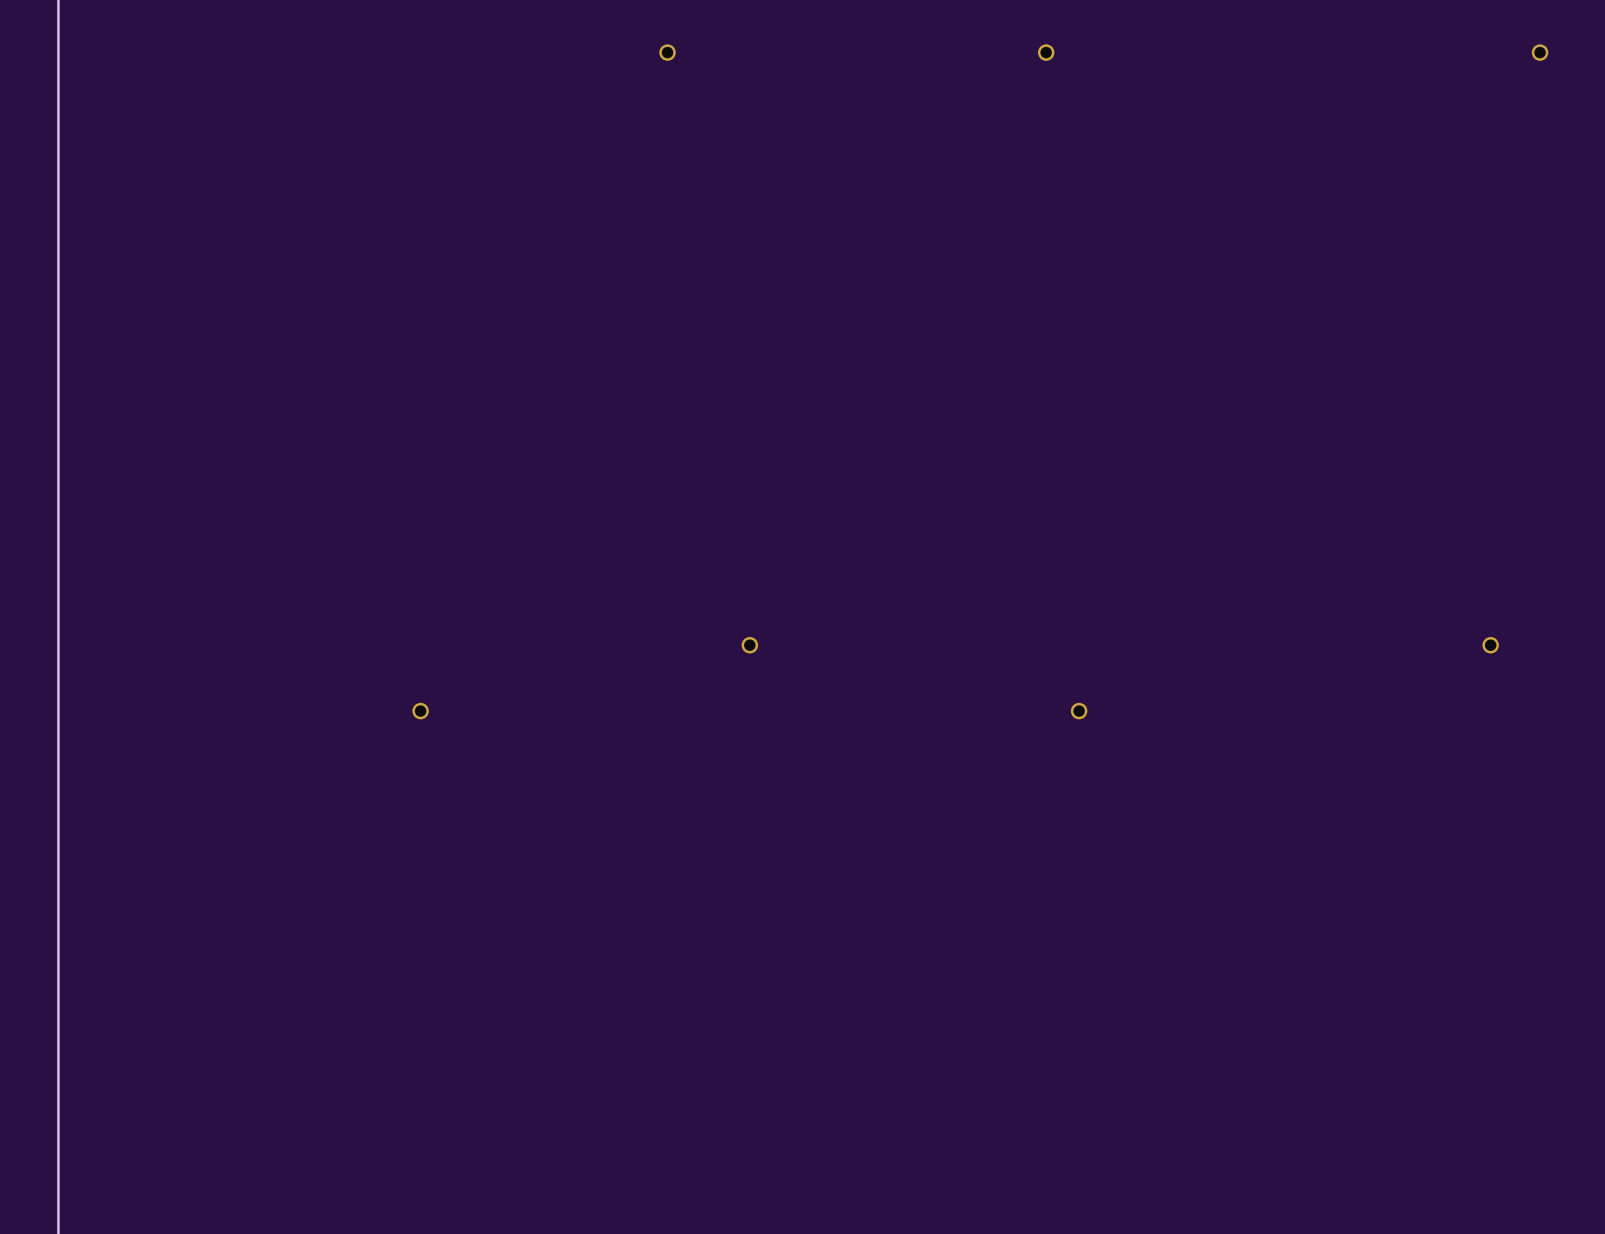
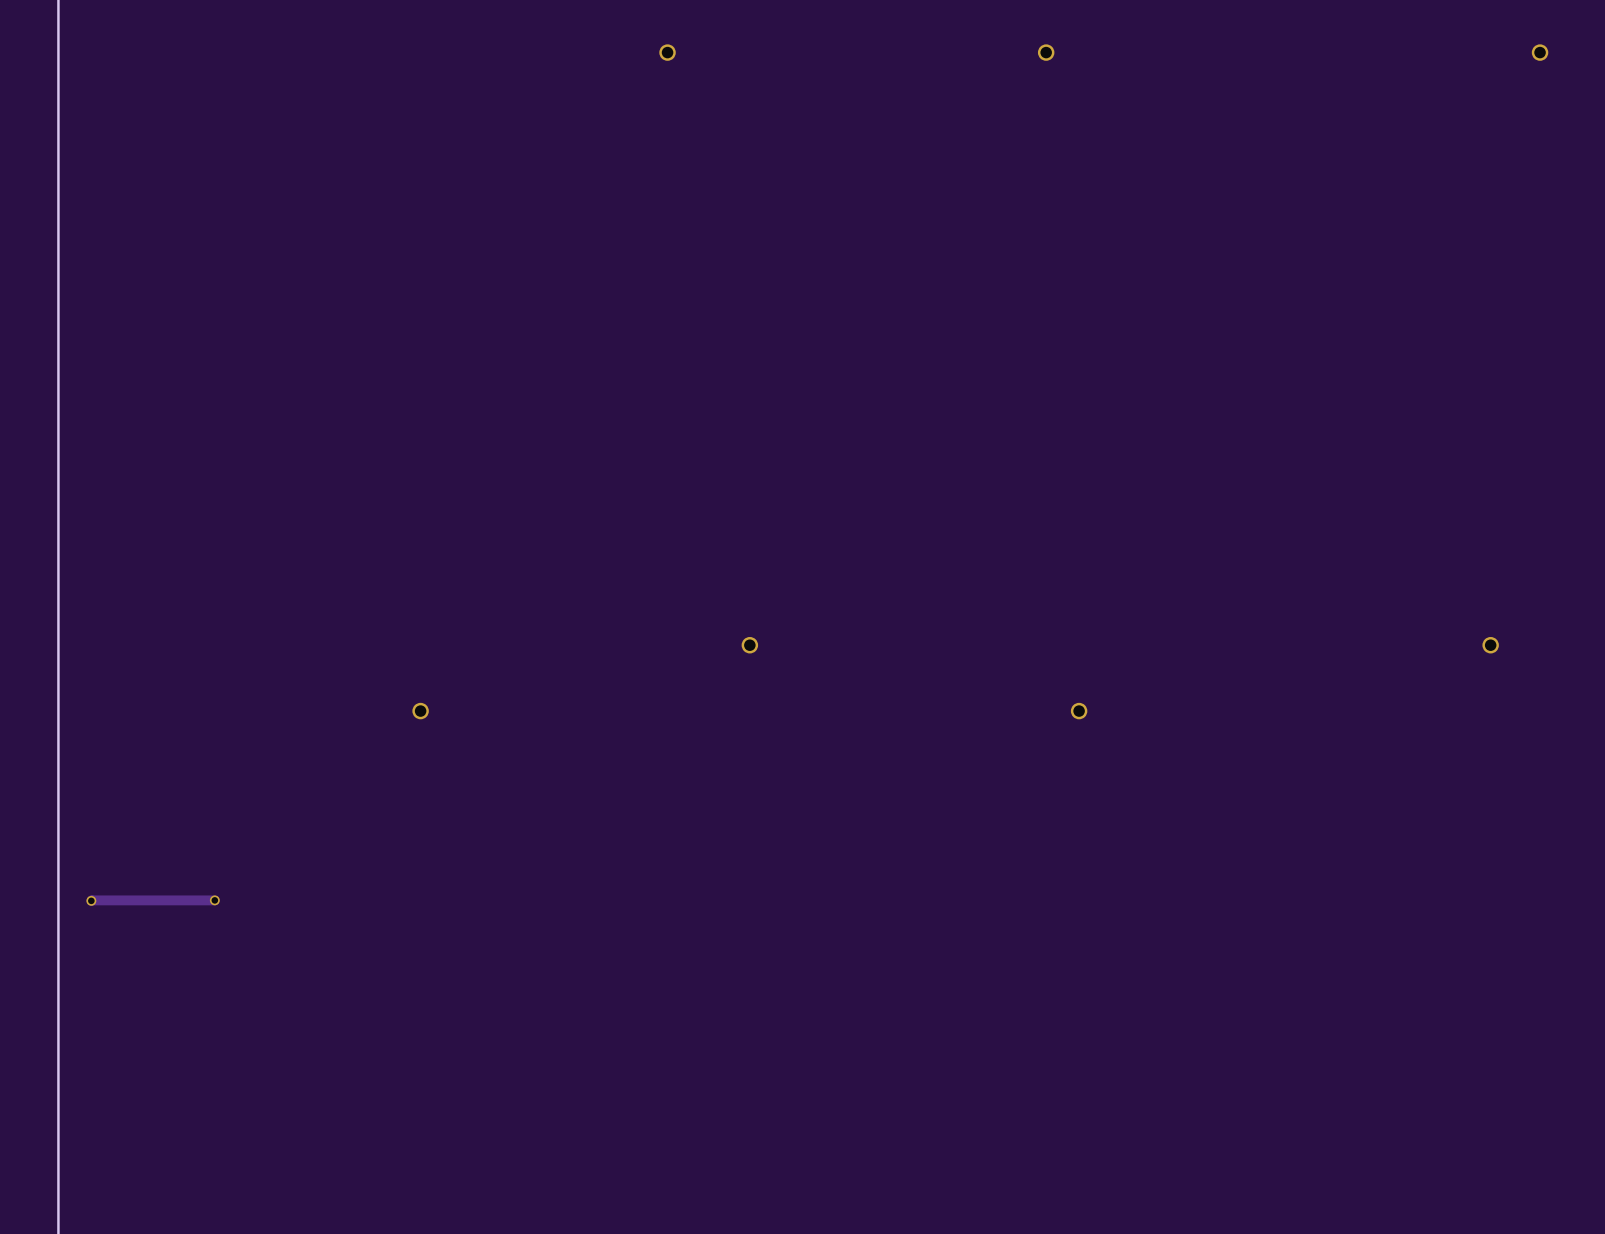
via: none -> (91, 900)
track: none -> (214, 900) (91, 900)
via: none -> (214, 900)

